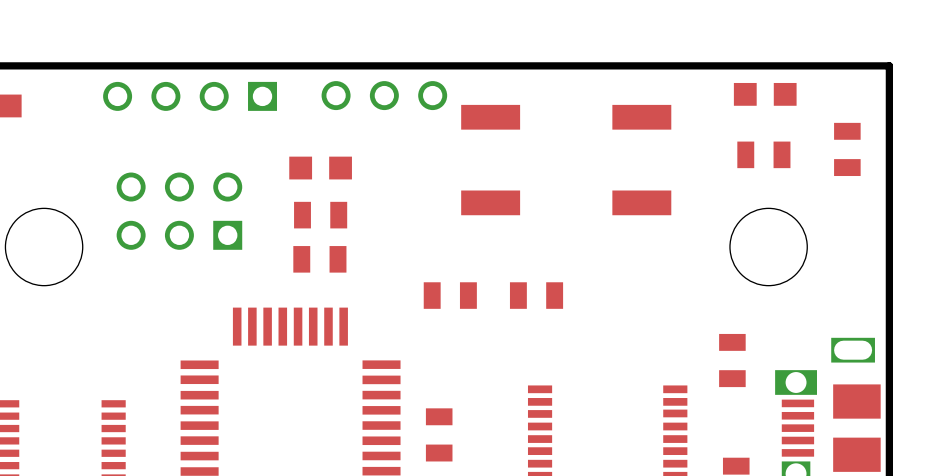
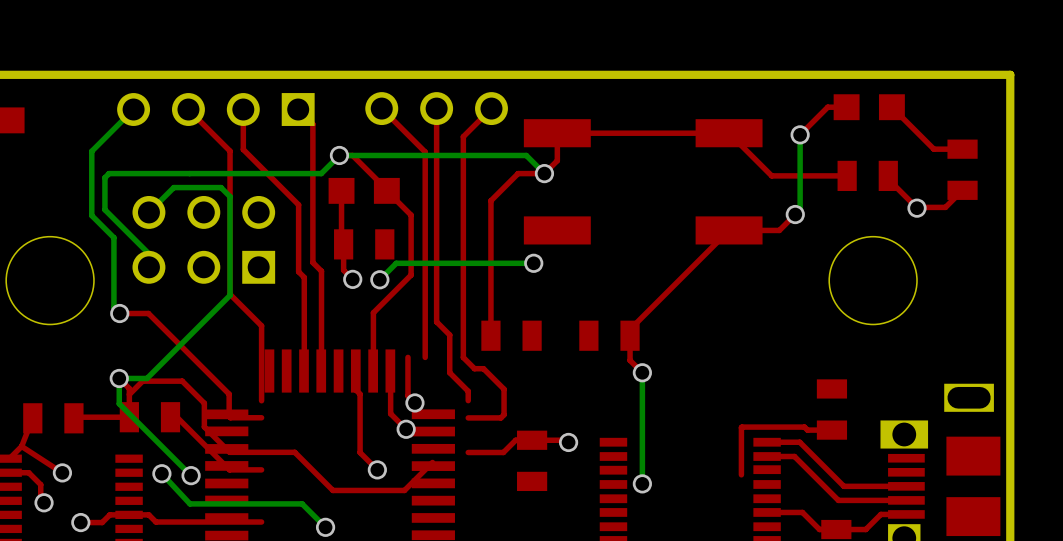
top track: none -> (846, 107) (827, 107) (800, 134)
top track: none -> (891, 107) (933, 149) (962, 149)
top track: none -> (381, 108) (425, 152) (425, 357)
top track: none -> (436, 108) (436, 321) (449, 335) (449, 372) (468, 391) (468, 400)
top track: none -> (491, 108) (463, 136) (463, 357) (474, 368) (483, 368) (504, 389) (504, 414) (500, 417) (468, 417)
bottom track: none -> (133, 109) (91, 151) (91, 215) (113, 237) (113, 307) (119, 313)
top track: none -> (188, 109) (230, 151) (230, 294) (261, 325) (261, 400)
top track: none -> (243, 109) (243, 149) (298, 204) (298, 271) (304, 277) (304, 357)
top track: none -> (298, 109) (312, 124) (312, 262) (321, 271) (321, 357)
bottom track: none -> (800, 134) (800, 209) (795, 214)
via: none -> (800, 134)
top track: none -> (339, 155) (352, 155) (411, 215) (411, 275) (373, 312) (373, 357)
via: none -> (339, 155)
bottom track: none -> (544, 173) (526, 155) (339, 155) (321, 173) (109, 173) (104, 177) (104, 209) (148, 253) (148, 267)
via: none -> (544, 173)
top track: none -> (847, 175) (771, 175) (729, 133) (557, 133) (557, 160) (544, 173) (518, 173) (490, 200) (490, 335)
top track: none -> (888, 175) (888, 179) (916, 207) (945, 207) (962, 190)
top track: none -> (341, 190) (343, 270) (352, 279)
via: none -> (917, 208)
bottom track: none -> (148, 212) (173, 187) (220, 187) (230, 196) (230, 295) (146, 378) (119, 378) (119, 403) (191, 475)
top track: none -> (795, 214) (779, 230) (729, 230) (630, 329) (630, 360) (642, 372)
via: none -> (795, 214)
bottom track: none -> (533, 263) (396, 263) (379, 279)
via: none -> (533, 263)
via: none -> (352, 279)
via: none -> (379, 279)
part: (319, 259) -> none
top track: none -> (119, 313) (148, 313) (229, 394) (230, 417) (261, 417)
via: none -> (119, 313)
top track: none -> (356, 357) (356, 390) (360, 394) (360, 452) (377, 469)
top track: none -> (390, 357) (390, 413) (406, 429)
top track: none -> (407, 357) (407, 395) (414, 402)
bottom track: none -> (642, 372) (642, 483)
via: none -> (642, 372)
top track: none -> (119, 378) (129, 388) (129, 417) (73, 418)
via: none -> (119, 378)
top track: none -> (129, 394) (142, 381) (182, 381) (204, 403) (204, 426) (229, 452) (294, 452) (332, 490) (404, 490) (432, 462)
via: none -> (414, 402)
part: none -> (149, 417)
top track: none -> (170, 417) (176, 417) (229, 469) (261, 469)
top track: none -> (32, 418) (21, 446) (8, 458)
part: none -> (53, 418)
via: none -> (406, 429)
top track: none -> (831, 430) (807, 430) (804, 427) (741, 427) (741, 474)
top track: none -> (568, 442) (566, 440) (515, 440) (503, 452) (468, 452)
via: none -> (568, 442)
top track: none -> (767, 442) (799, 442) (843, 486) (906, 486)
top track: none -> (21, 446) (62, 472)
top track: none -> (767, 456) (794, 456) (838, 500) (906, 500)
via: none -> (377, 469)
top track: none -> (8, 472) (28, 472) (40, 484) (40, 499) (44, 502)
via: none -> (62, 472)
bottom track: none -> (161, 473) (189, 503) (302, 503) (325, 527)
via: none -> (161, 473)
via: none -> (191, 475)
via: none -> (642, 483)
part position: (439, 434) -> (532, 460)
via: none -> (44, 502)
top track: none -> (767, 512) (802, 512) (819, 529) (865, 529) (880, 514) (906, 514)
top track: none -> (261, 522) (155, 522) (148, 514) (109, 514) (102, 522) (80, 522)
via: none -> (80, 522)
via: none -> (325, 527)

